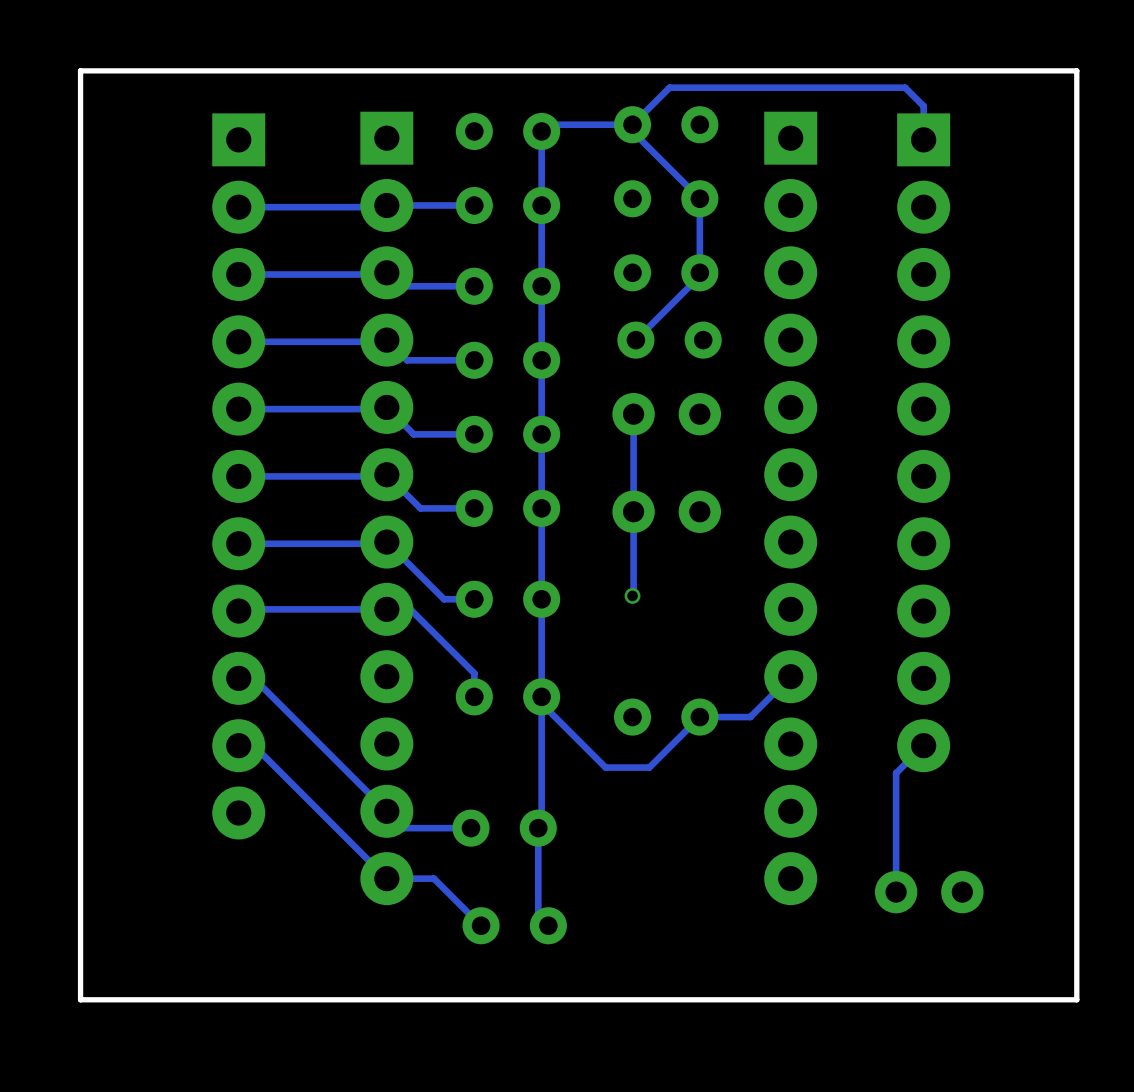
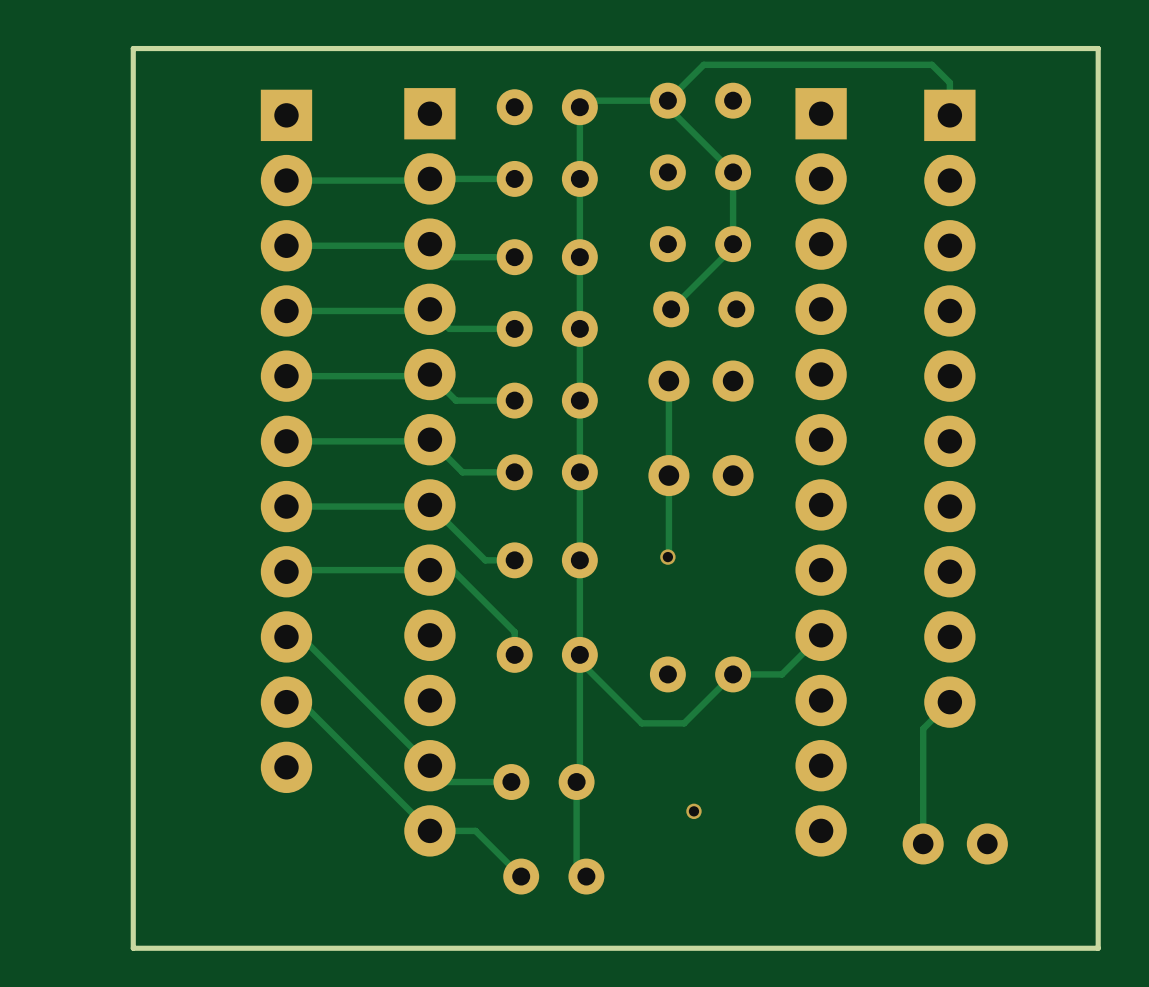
via: none -> (693, 811)

